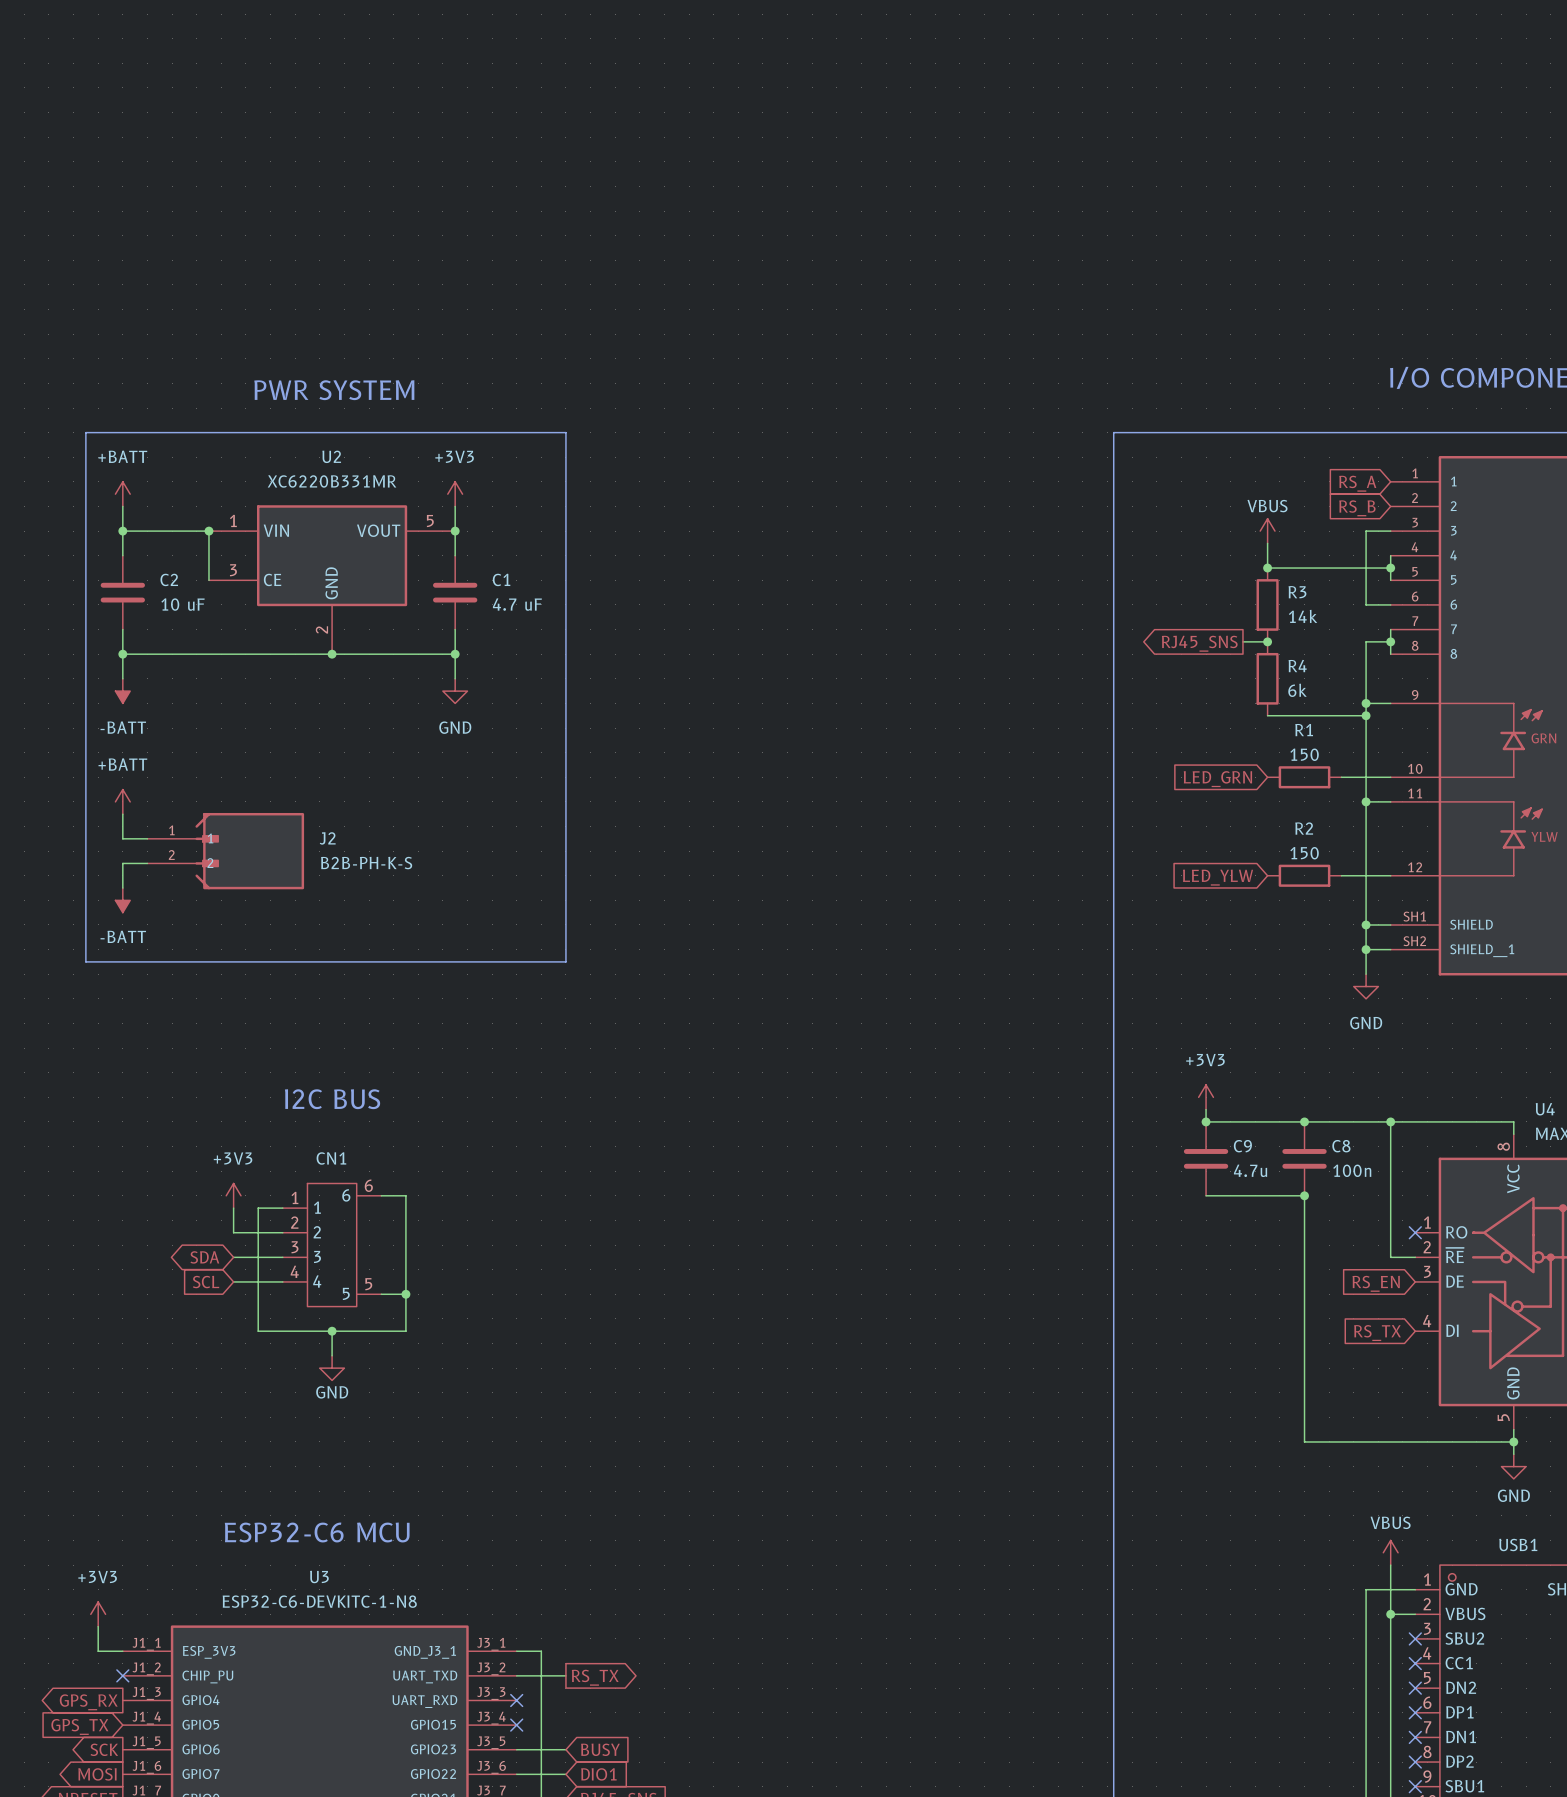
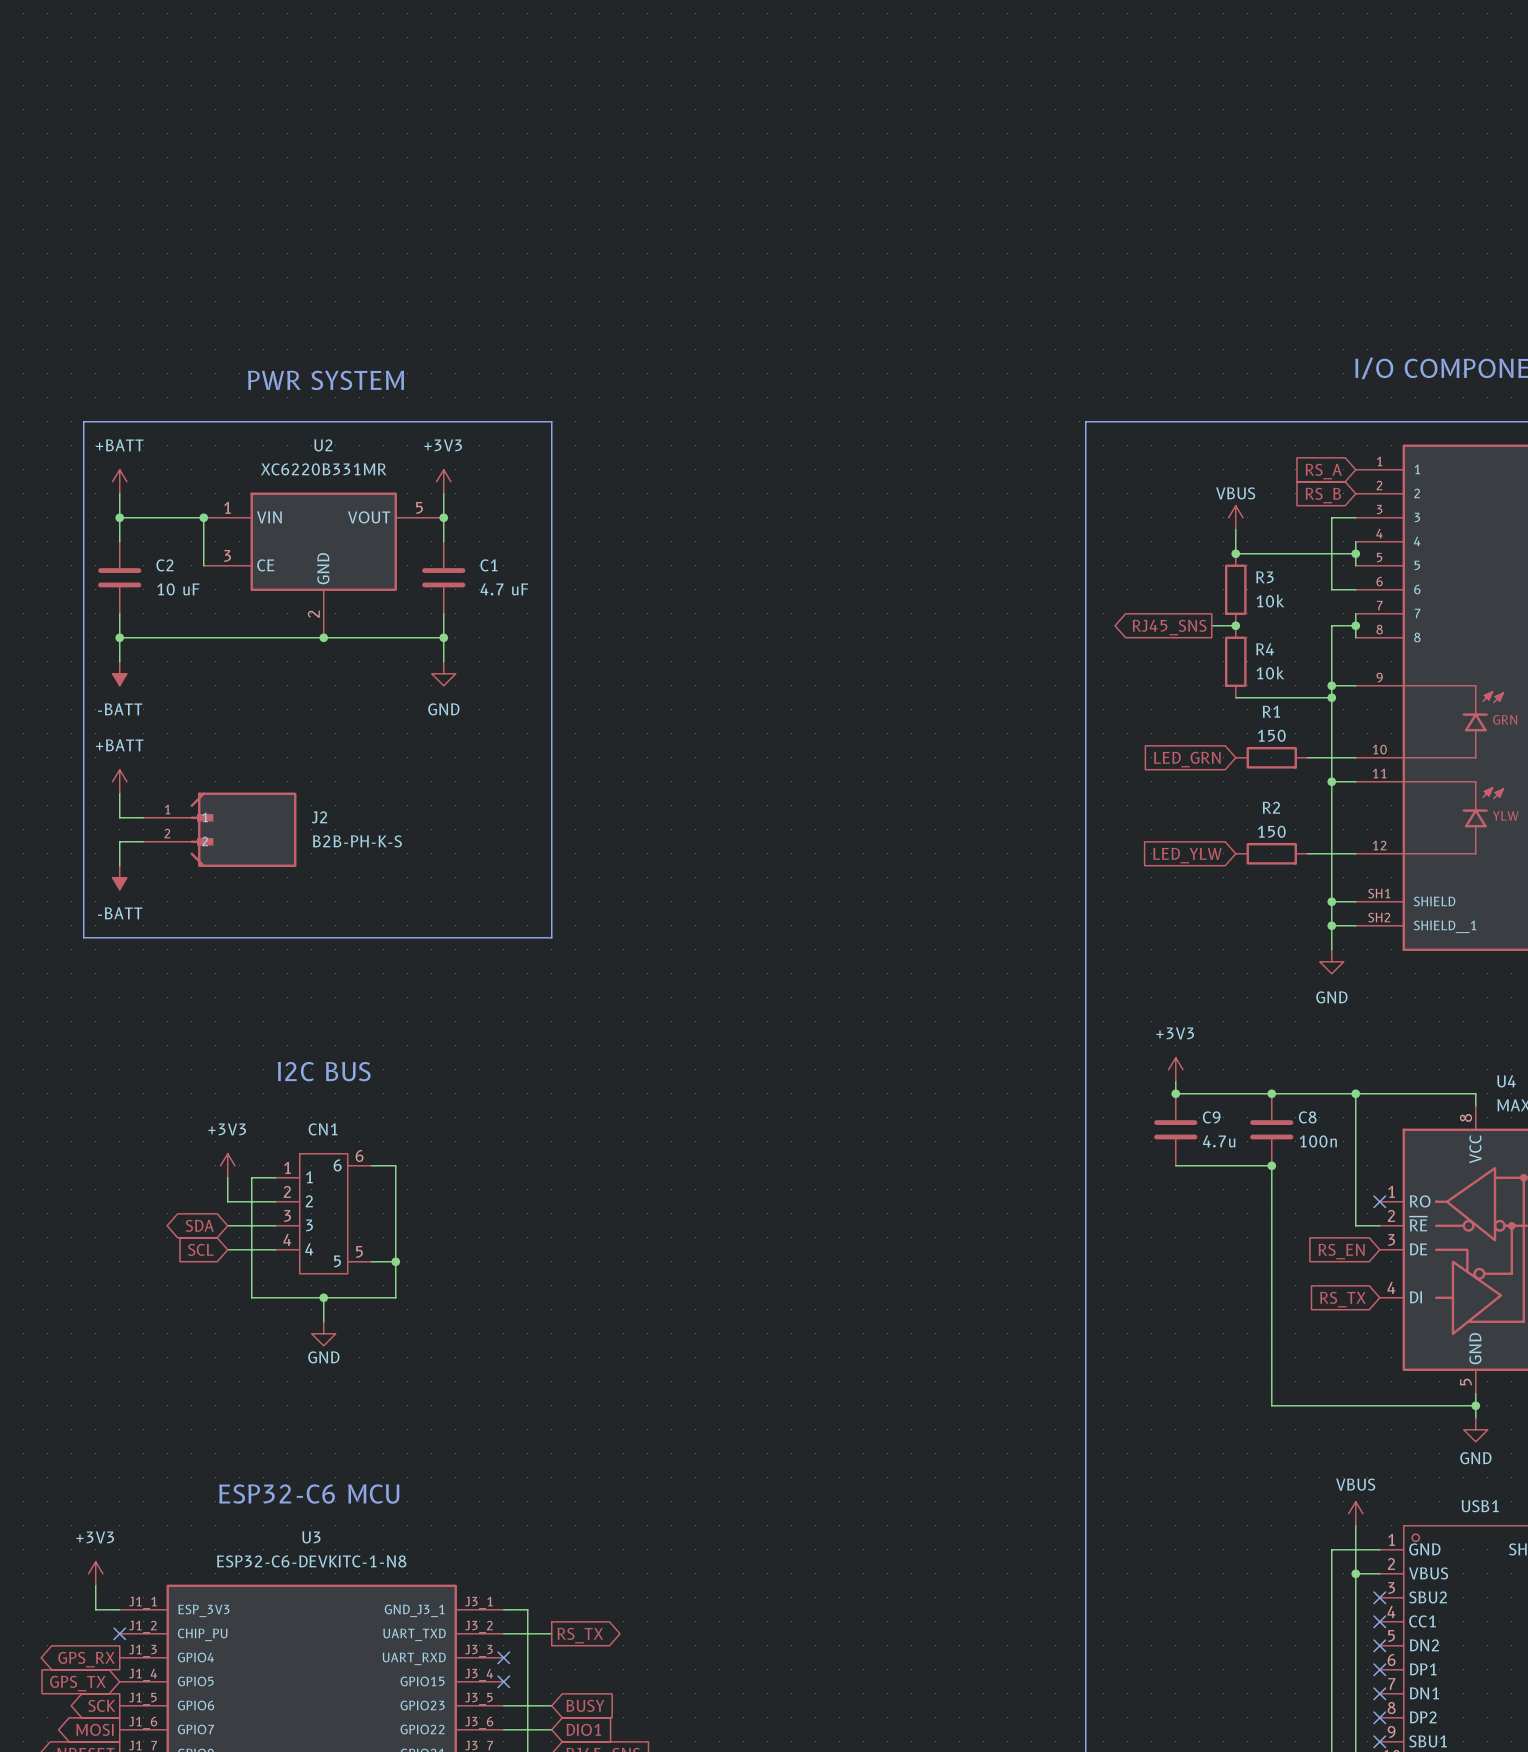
R3 value: 14k (1303, 616) -> 10k (1270, 600)
R4 value: 6k (1297, 690) -> 10k (1270, 672)

